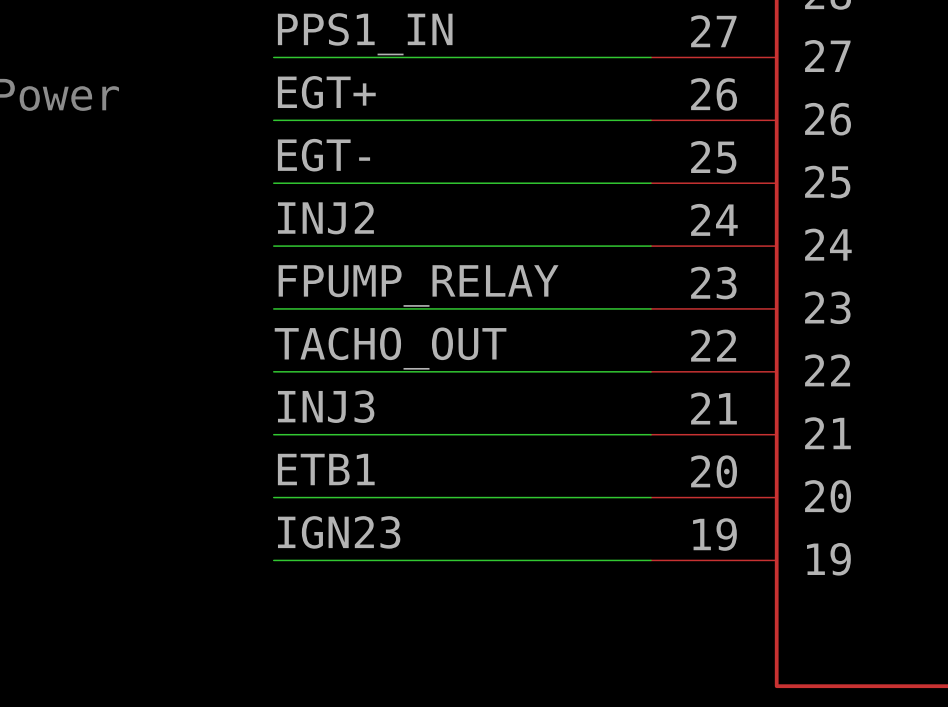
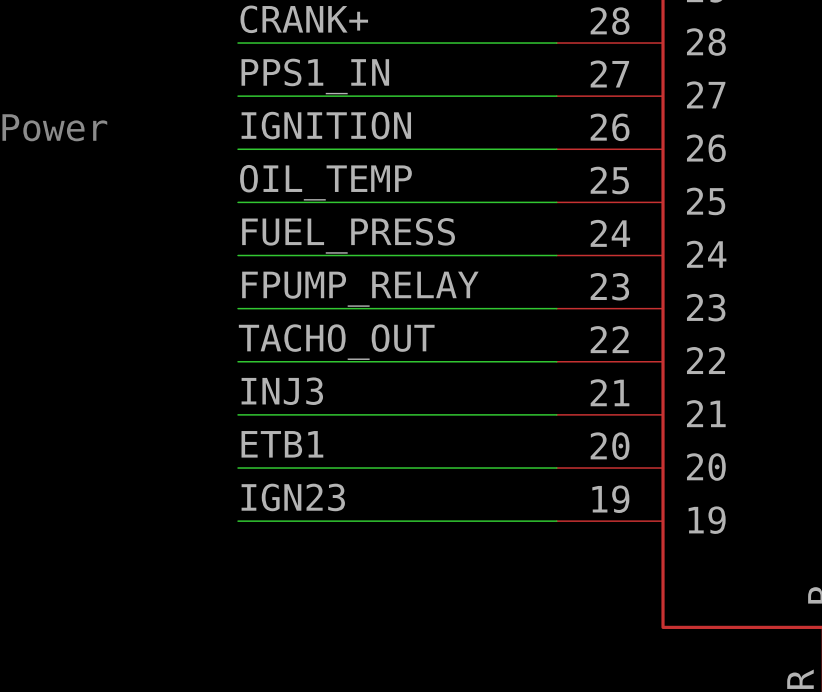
label: EGT+ (326, 92) -> IGNITION (326, 125)
label: EGT- (323, 155) -> OIL_TEMP (325, 182)
label: INJ2 (325, 218) -> FUEL_PRESS (348, 235)

